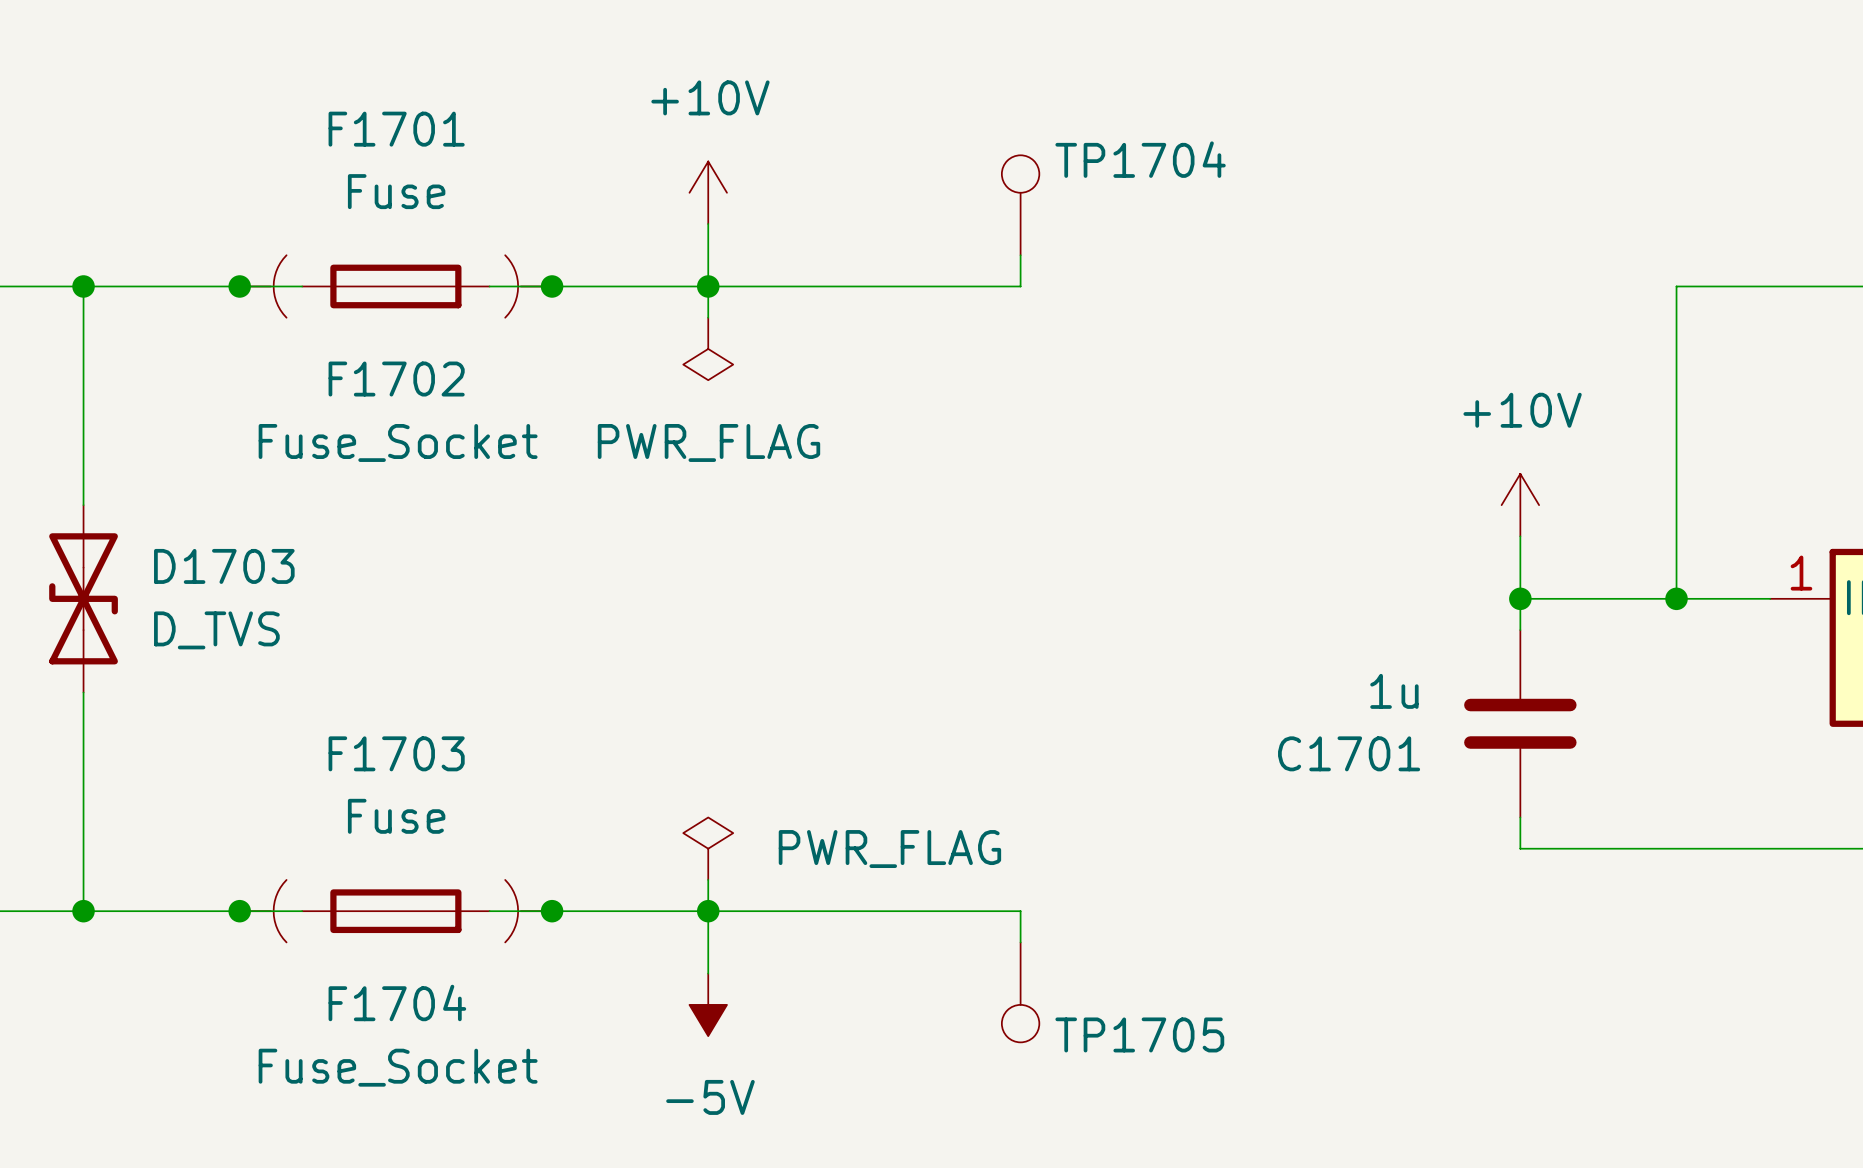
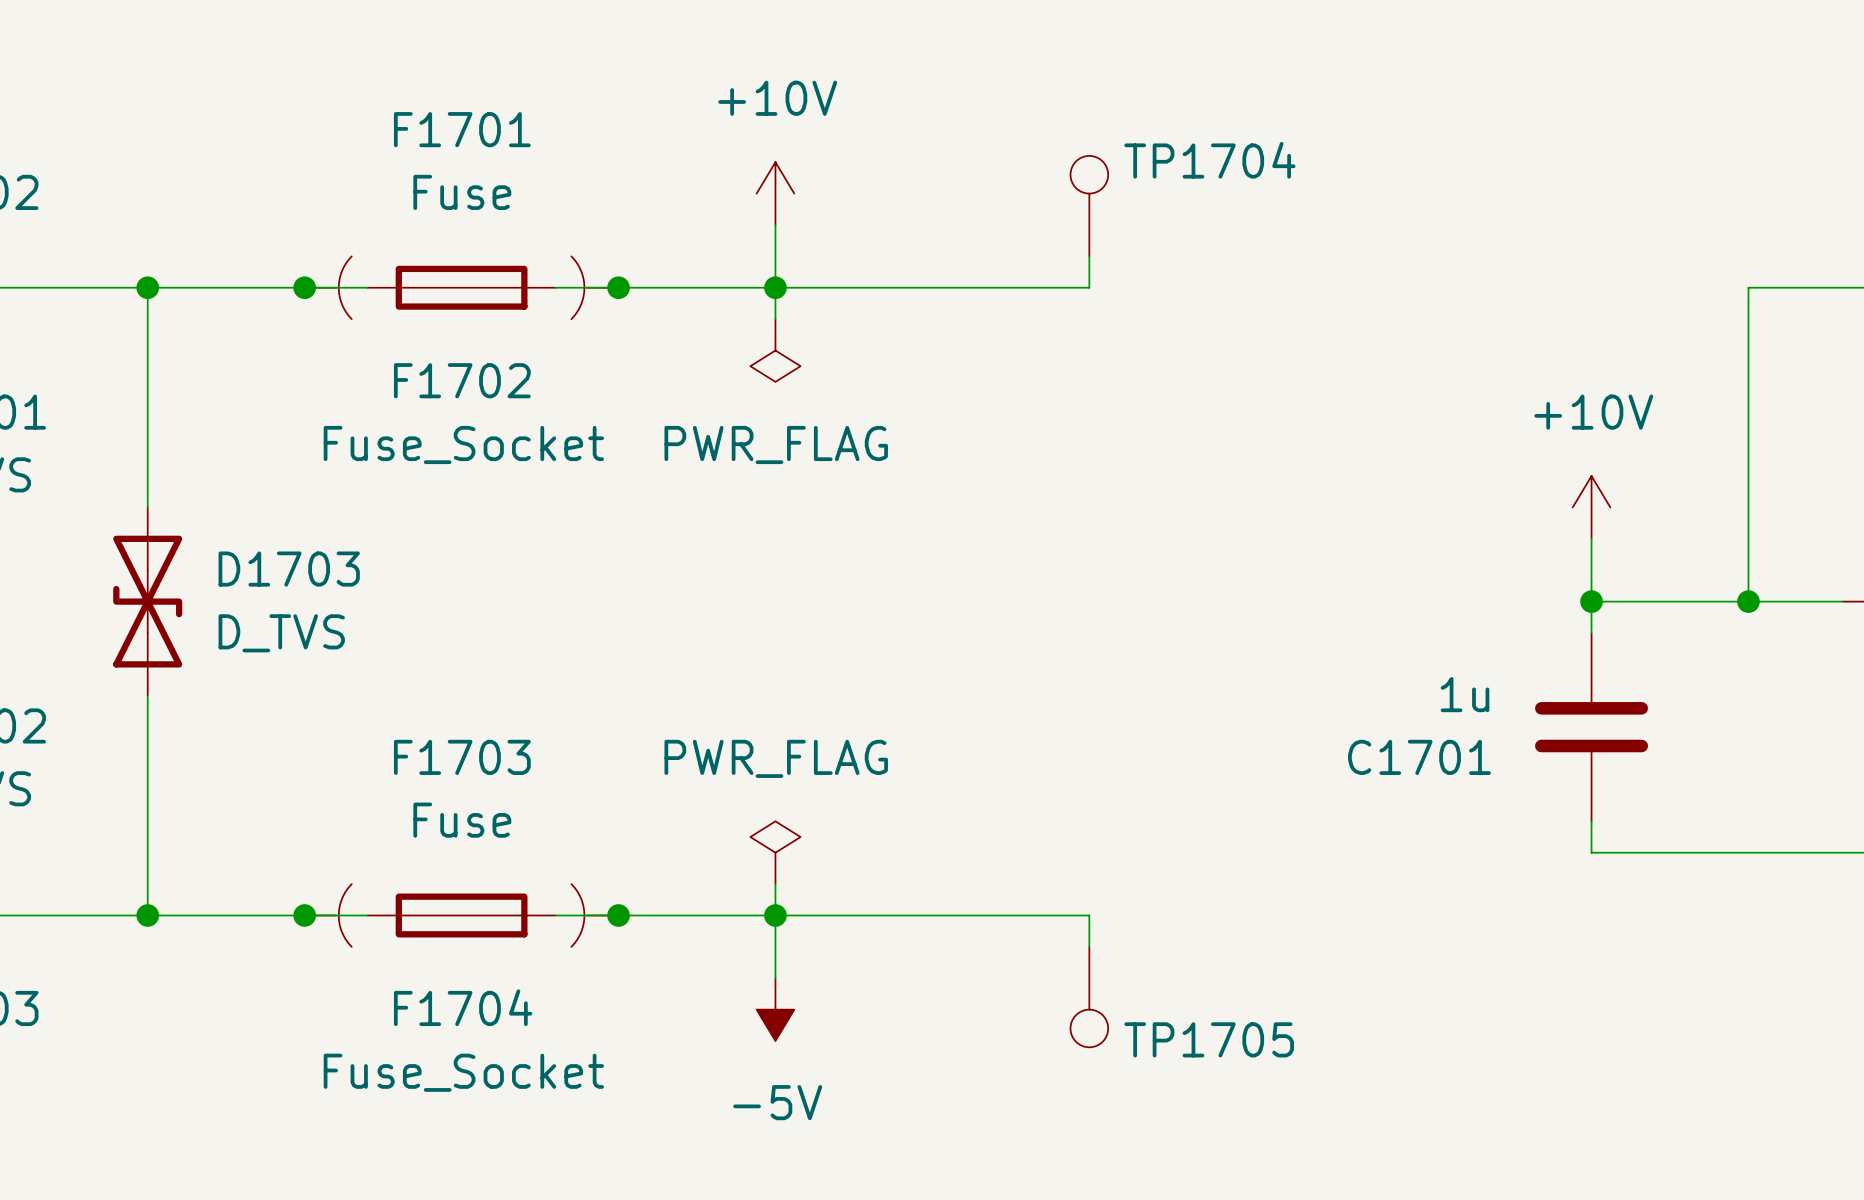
power symbol text position: PWR_FLAG (889, 849) -> PWR_FLAG (776, 758)

